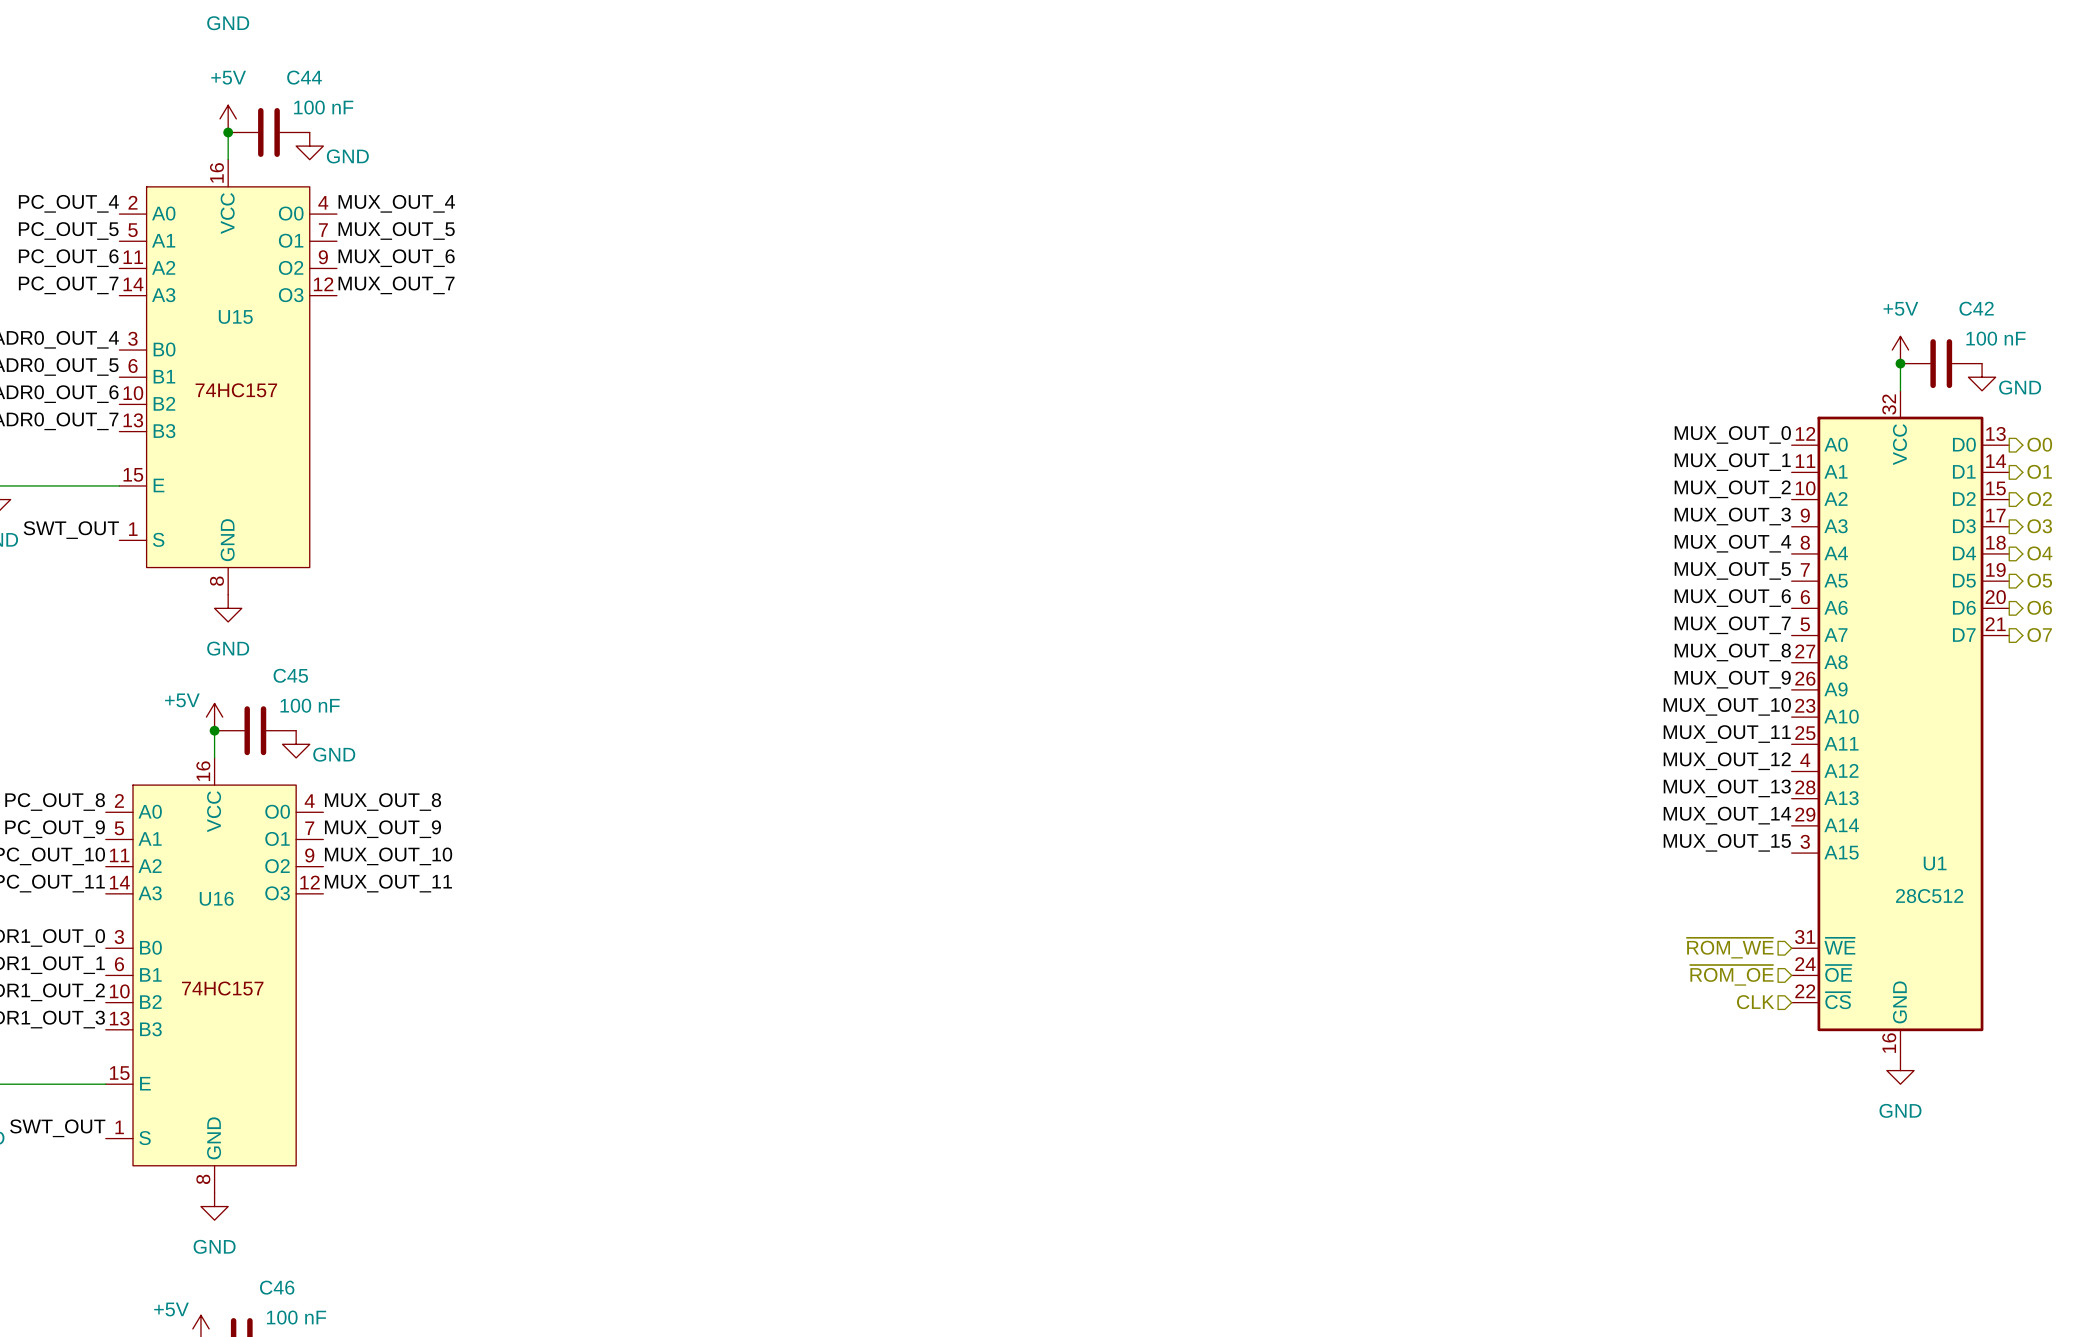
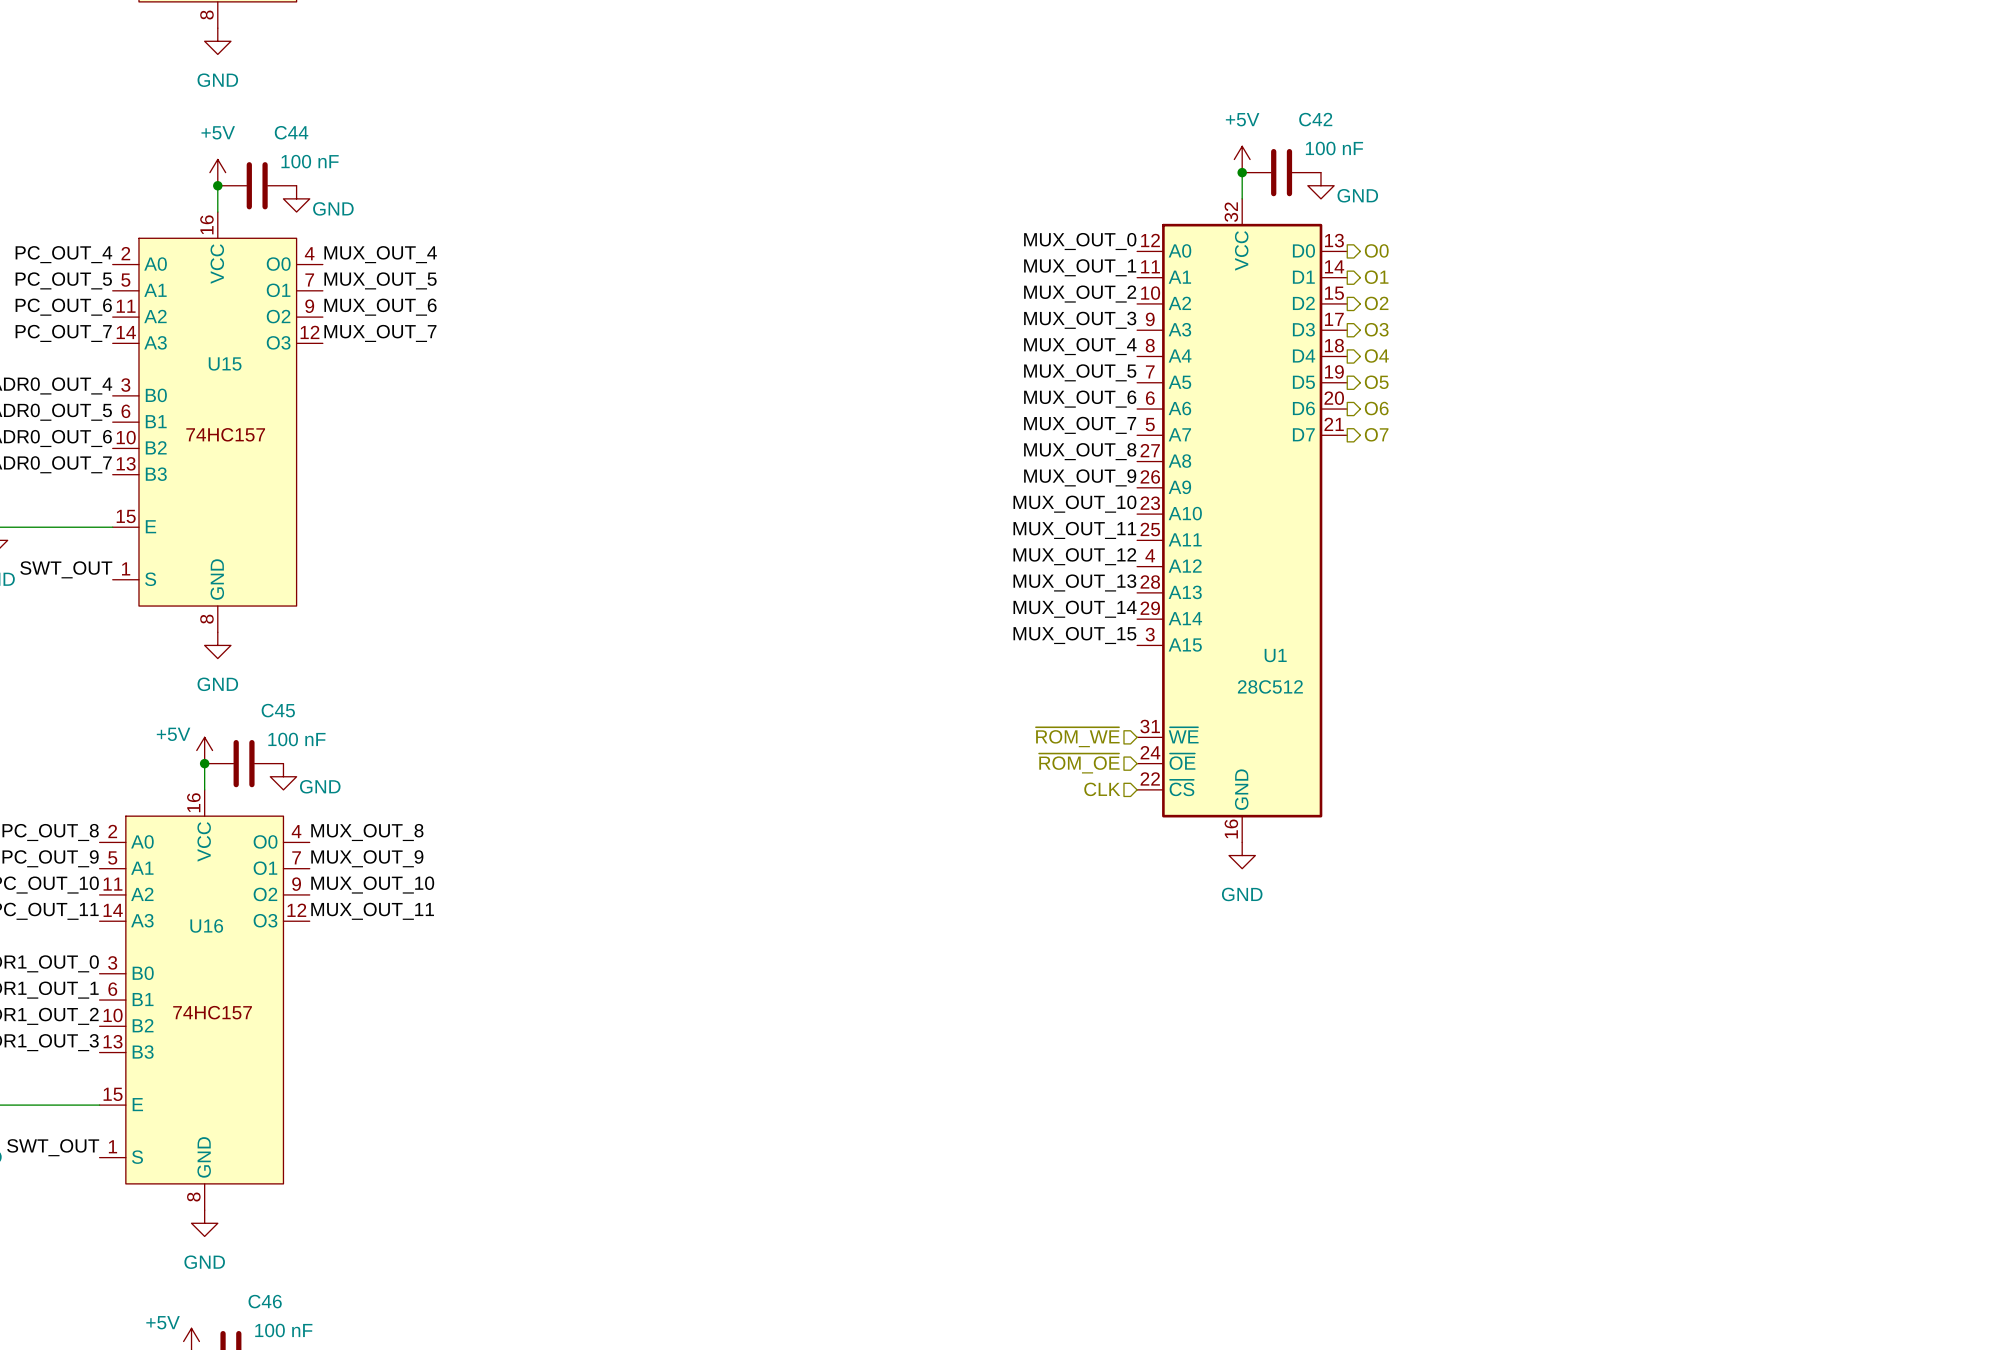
power symbol: none -> +5V (1242, 159)
wire: none -> (1242, 172) (1242, 198)
junction: none -> (1242, 172)
power symbol: none -> GND (1320, 185)
label: none -> MUX_OUT_0 (1080, 241)
hierarchical label: none -> O0 (1376, 250)
label: none -> MUX_OUT_1 (1080, 267)
hierarchical label: none -> O1 (1376, 277)
label: none -> MUX_OUT_2 (1080, 294)
hierarchical label: none -> O2 (1376, 303)
label: none -> MUX_OUT_3 (1080, 320)
hierarchical label: none -> O3 (1376, 329)
label: none -> MUX_OUT_4 (1080, 346)
hierarchical label: none -> O4 (1376, 355)
label: none -> MUX_OUT_5 (1080, 372)
hierarchical label: none -> O5 (1376, 382)
power symbol: +5V (1900, 350) -> none
label: none -> MUX_OUT_6 (1080, 399)
hierarchical label: none -> O6 (1376, 408)
wire: (1900, 363) (1900, 390) -> none
junction: (1900, 363) -> none
C42 position: (1941, 363) -> (1281, 172)
power symbol: GND (1982, 377) -> none
label: none -> MUX_OUT_7 (1080, 425)
hierarchical label: none -> O7 (1376, 434)
label: none -> MUX_OUT_8 (1080, 451)
label: none -> MUX_OUT_9 (1080, 477)
label: MUX_OUT_0 (1732, 434) -> none
hierarchical label: O0 (2039, 444) -> none
label: none -> MUX_OUT_10 (1074, 504)
label: MUX_OUT_1 (1732, 462) -> none
hierarchical label: O1 (2039, 471) -> none
label: none -> MUX_OUT_11 (1074, 530)
label: MUX_OUT_2 (1732, 489) -> none
hierarchical label: O2 (2039, 499) -> none
label: none -> MUX_OUT_12 (1074, 556)
label: MUX_OUT_3 (1732, 516) -> none
hierarchical label: O3 (2039, 526) -> none
label: none -> MUX_OUT_13 (1074, 582)
label: MUX_OUT_4 (1732, 543) -> none
hierarchical label: O4 (2039, 553) -> none
label: none -> MUX_OUT_14 (1075, 609)
label: MUX_OUT_5 (1732, 570) -> none
hierarchical label: O5 (2039, 580) -> none
label: none -> MUX_OUT_15 (1074, 635)
label: MUX_OUT_6 (1732, 598) -> none
hierarchical label: O6 (2039, 607) -> none
label: MUX_OUT_7 (1732, 625) -> none
hierarchical label: O7 (2039, 635) -> none
label: MUX_OUT_8 (1732, 652) -> none
label: MUX_OUT_9 (1732, 679) -> none
hierarchical label: none -> ~{ROM_WE} (1077, 737)
label: MUX_OUT_10 (1727, 706) -> none
U1 position: (1900, 723) -> (1242, 520)
hierarchical label: none -> ~{ROM_OE} (1079, 763)
label: MUX_OUT_11 (1727, 734) -> none
hierarchical label: none -> CLK (1102, 789)
label: MUX_OUT_12 (1727, 761) -> none
label: MUX_OUT_13 (1727, 788) -> none
label: MUX_OUT_14 (1727, 815) -> none
power symbol: none -> GND (1242, 855)
label: MUX_OUT_15 (1727, 842) -> none
hierarchical label: ~{ROM_WE} (1730, 948) -> none
hierarchical label: ~{ROM_OE} (1731, 975) -> none
hierarchical label: CLK (1755, 1002) -> none
power symbol: GND (1900, 1070) -> none

